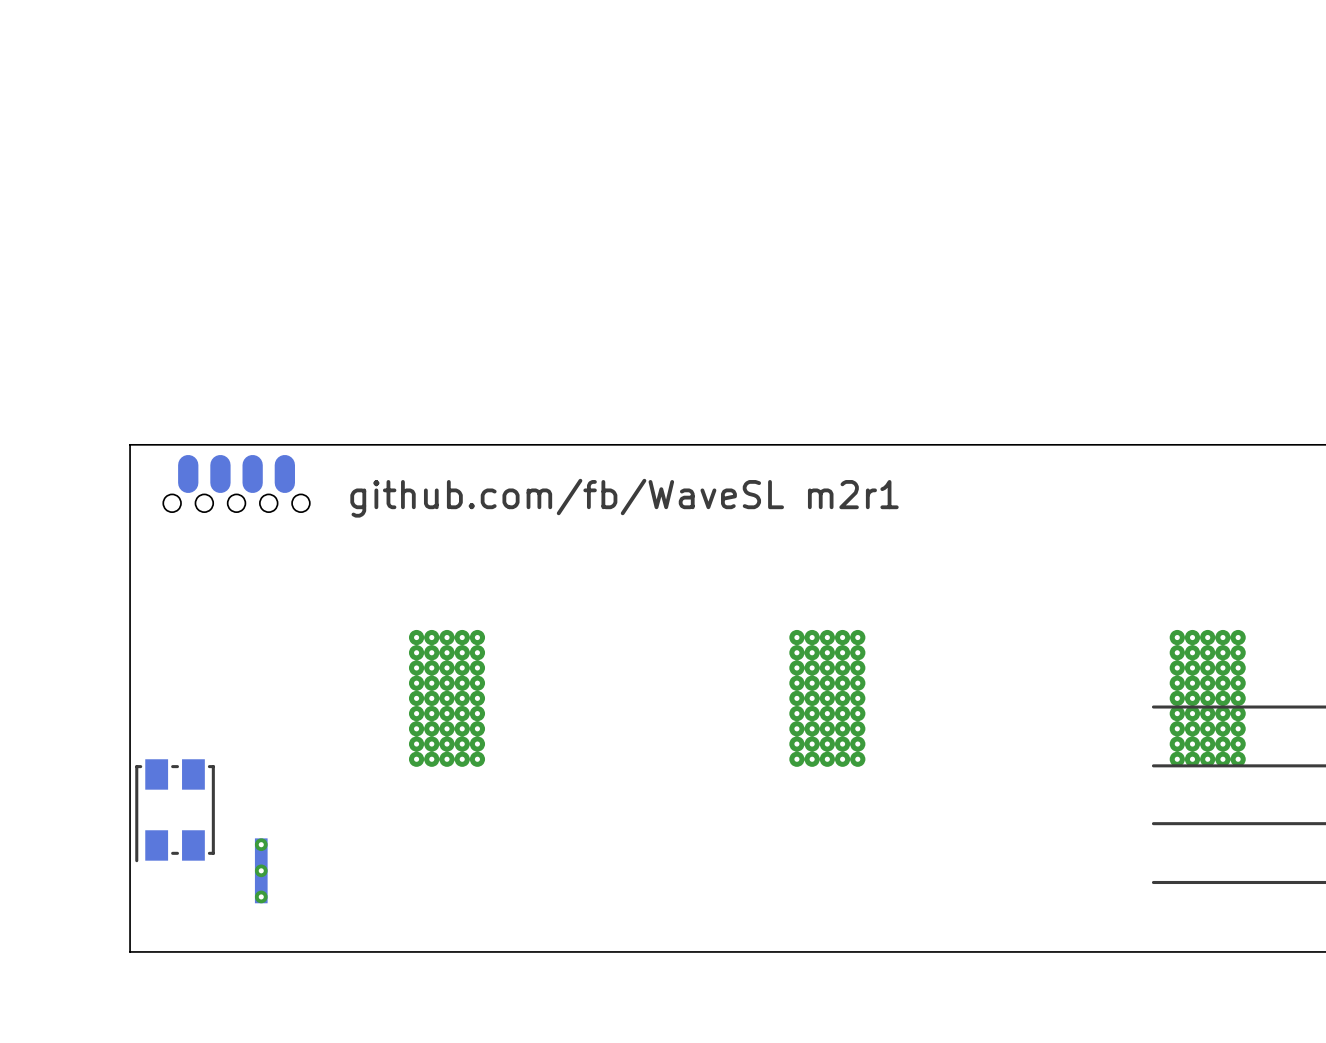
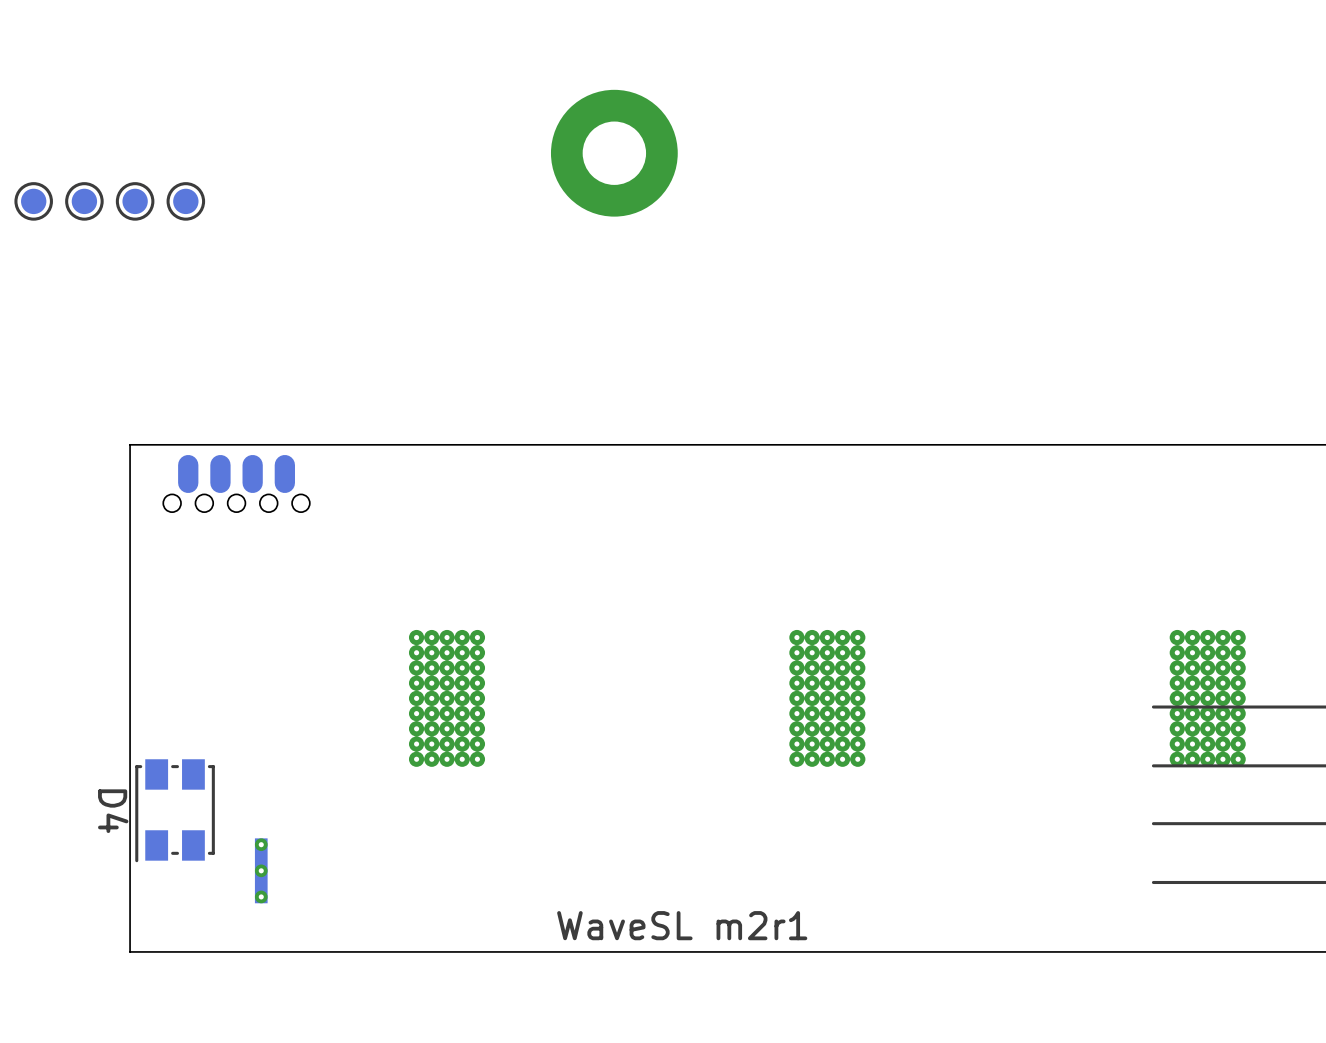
part: none -> (614, 153)
part: none -> (33, 201)
part: none -> (84, 201)
part: none -> (135, 201)
part: none -> (185, 201)
text: github.com/fb/WaveSL m2r1 (624, 498) -> none
D4 name: none -> D4 (113, 811)
text: none -> WaveSL m2r1 (682, 925)

